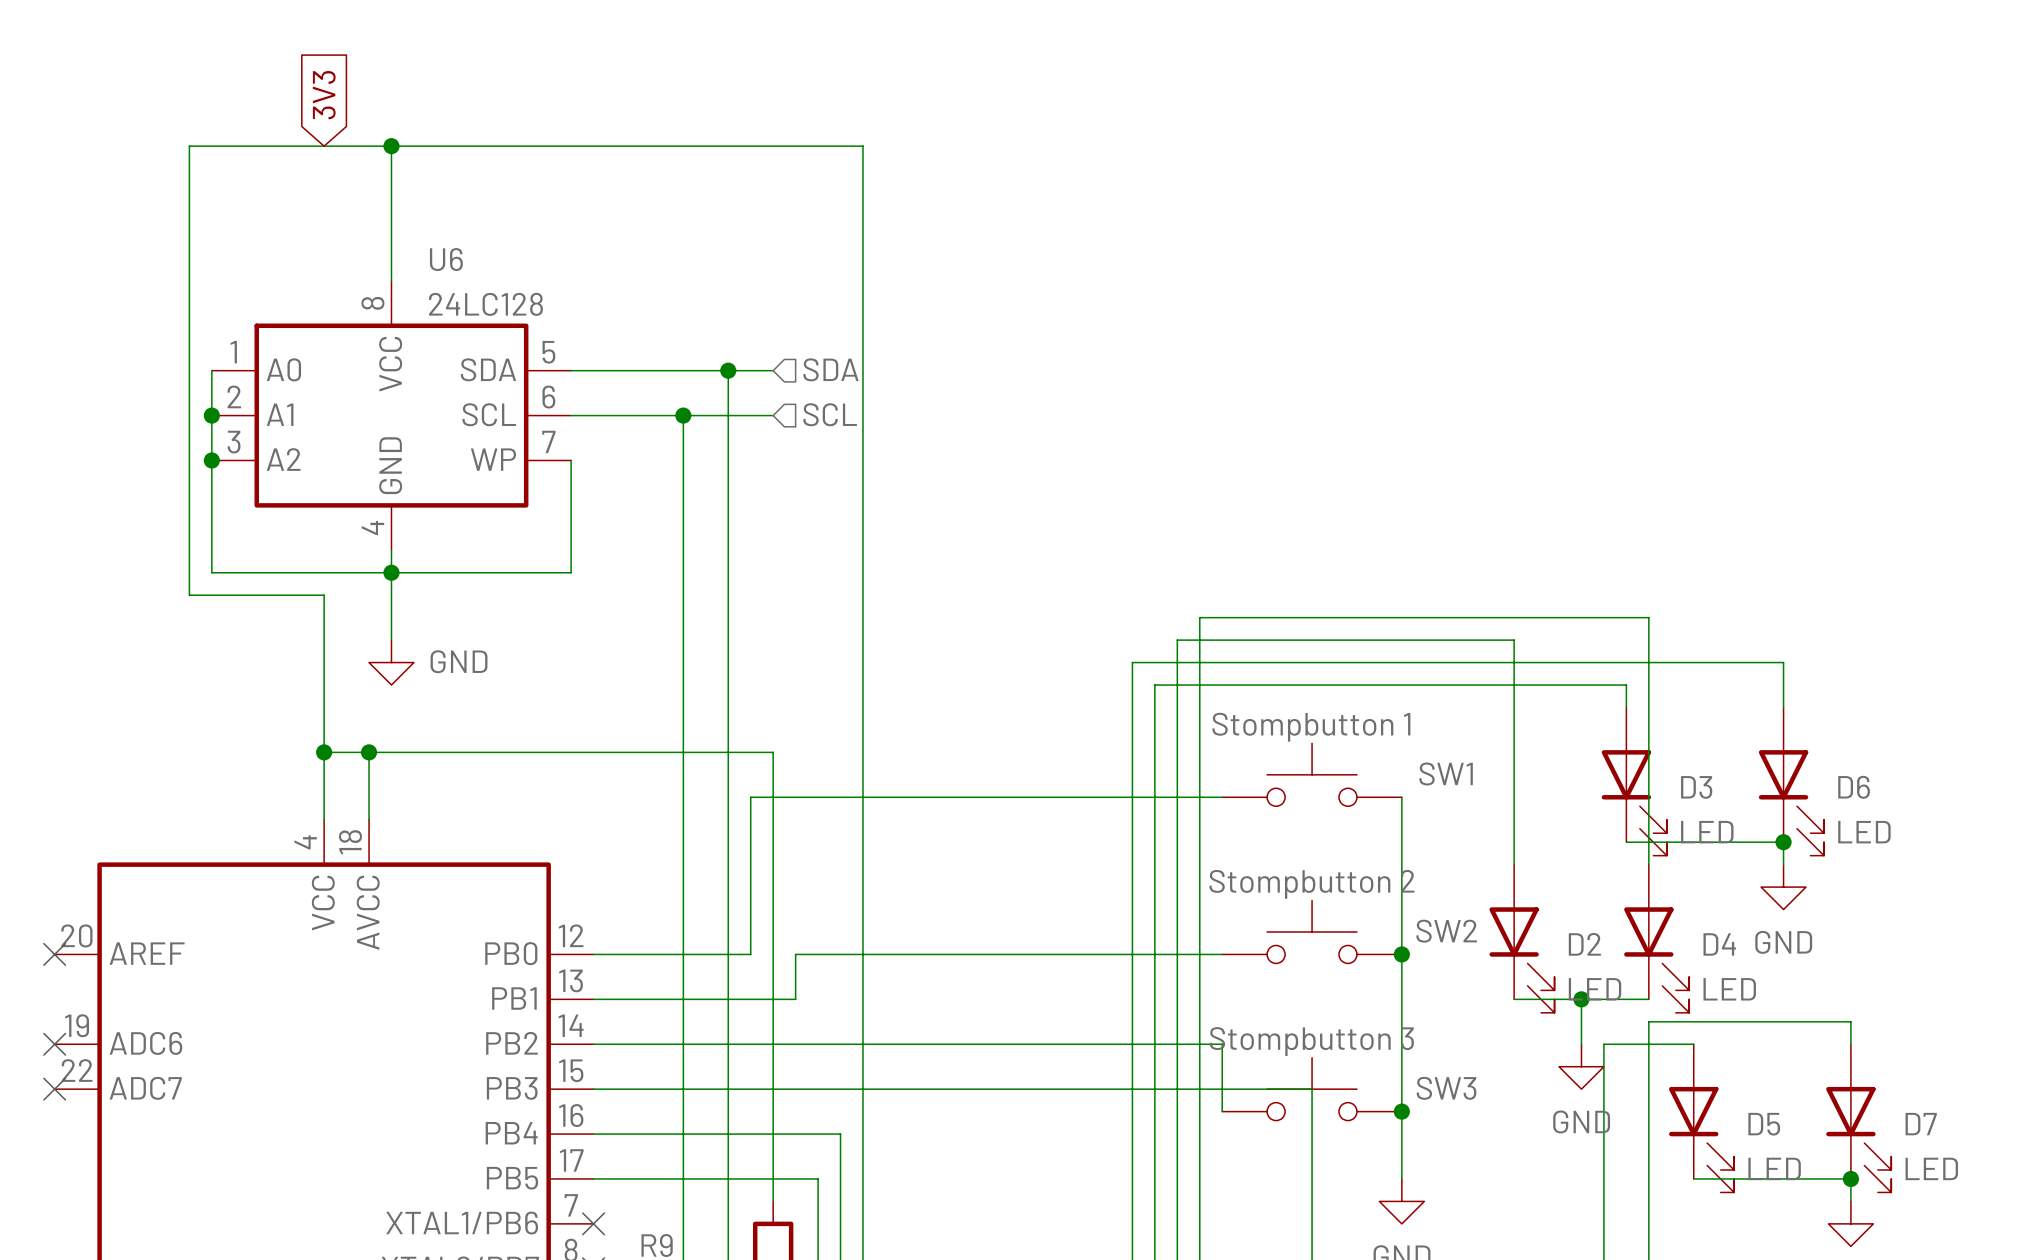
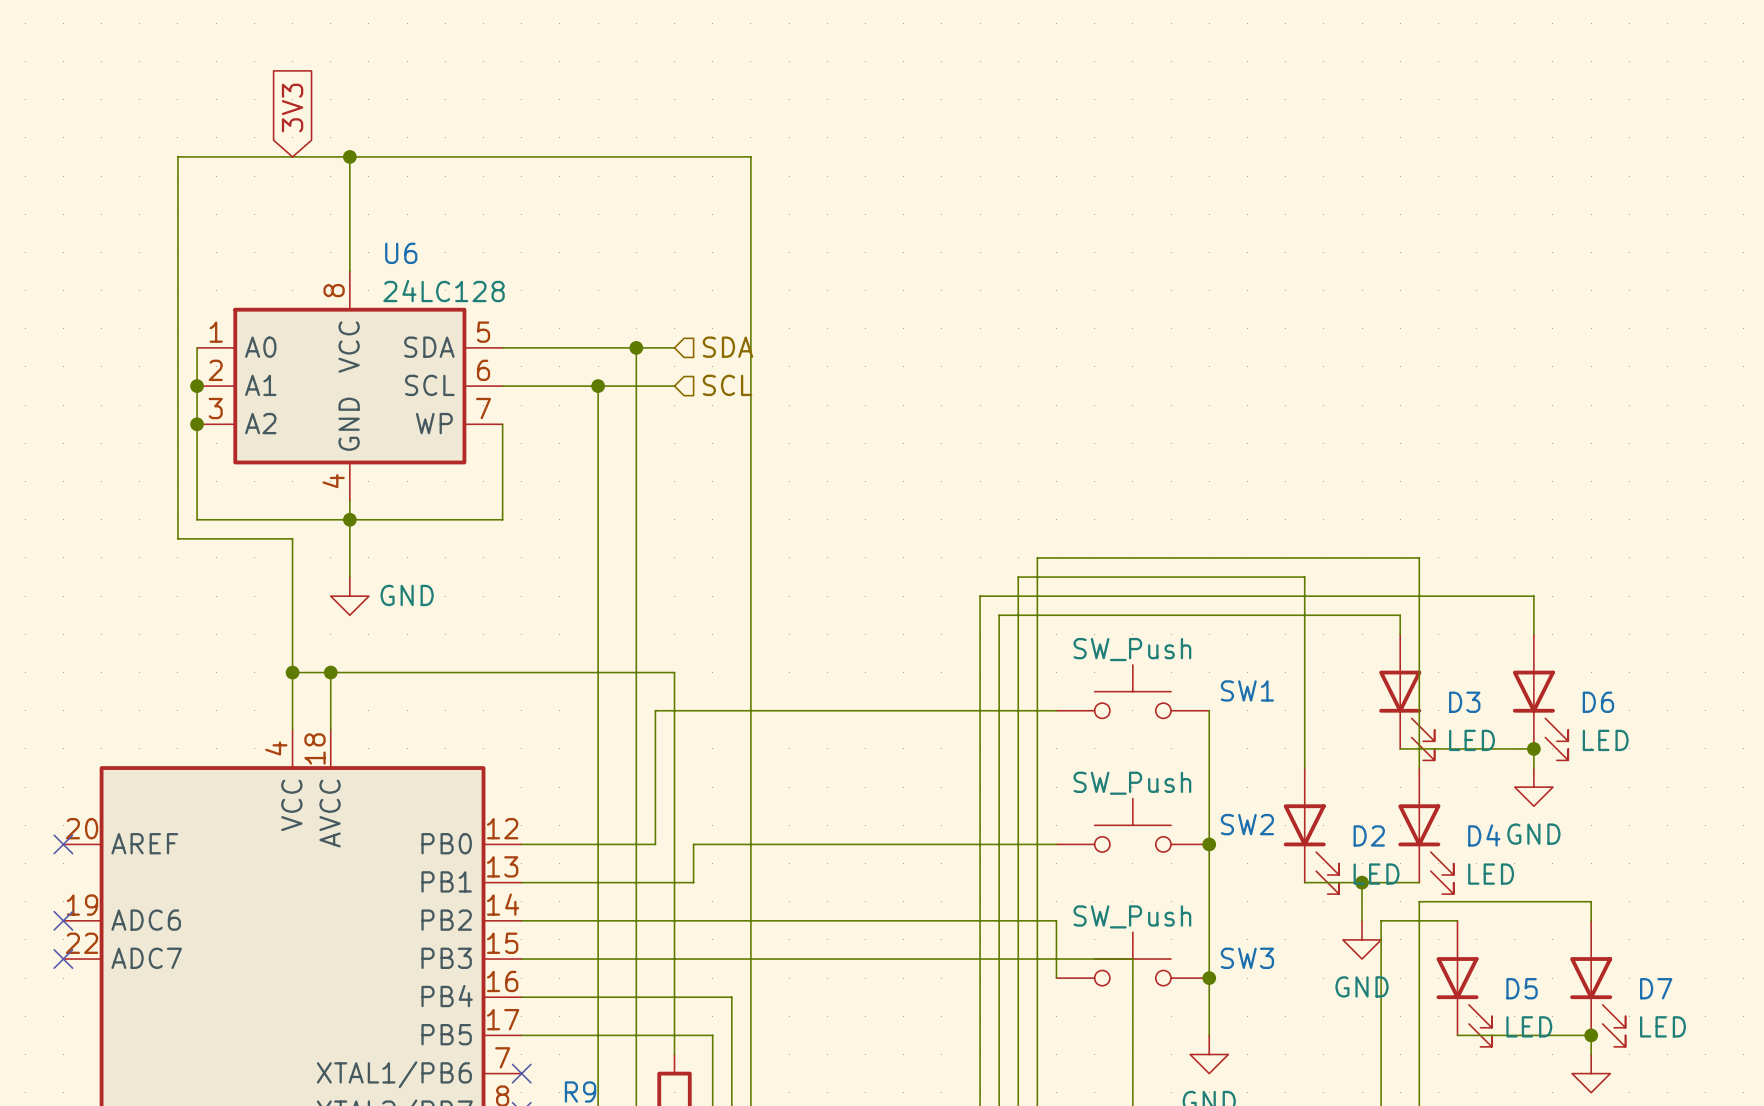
SW1 value: Stompbutton 1 (1311, 727) -> SW_Push (1132, 649)
SW2 value: Stompbutton 2 (1311, 884) -> SW_Push (1132, 783)
SW3 value: Stompbutton 3 (1311, 1041) -> SW_Push (1132, 916)

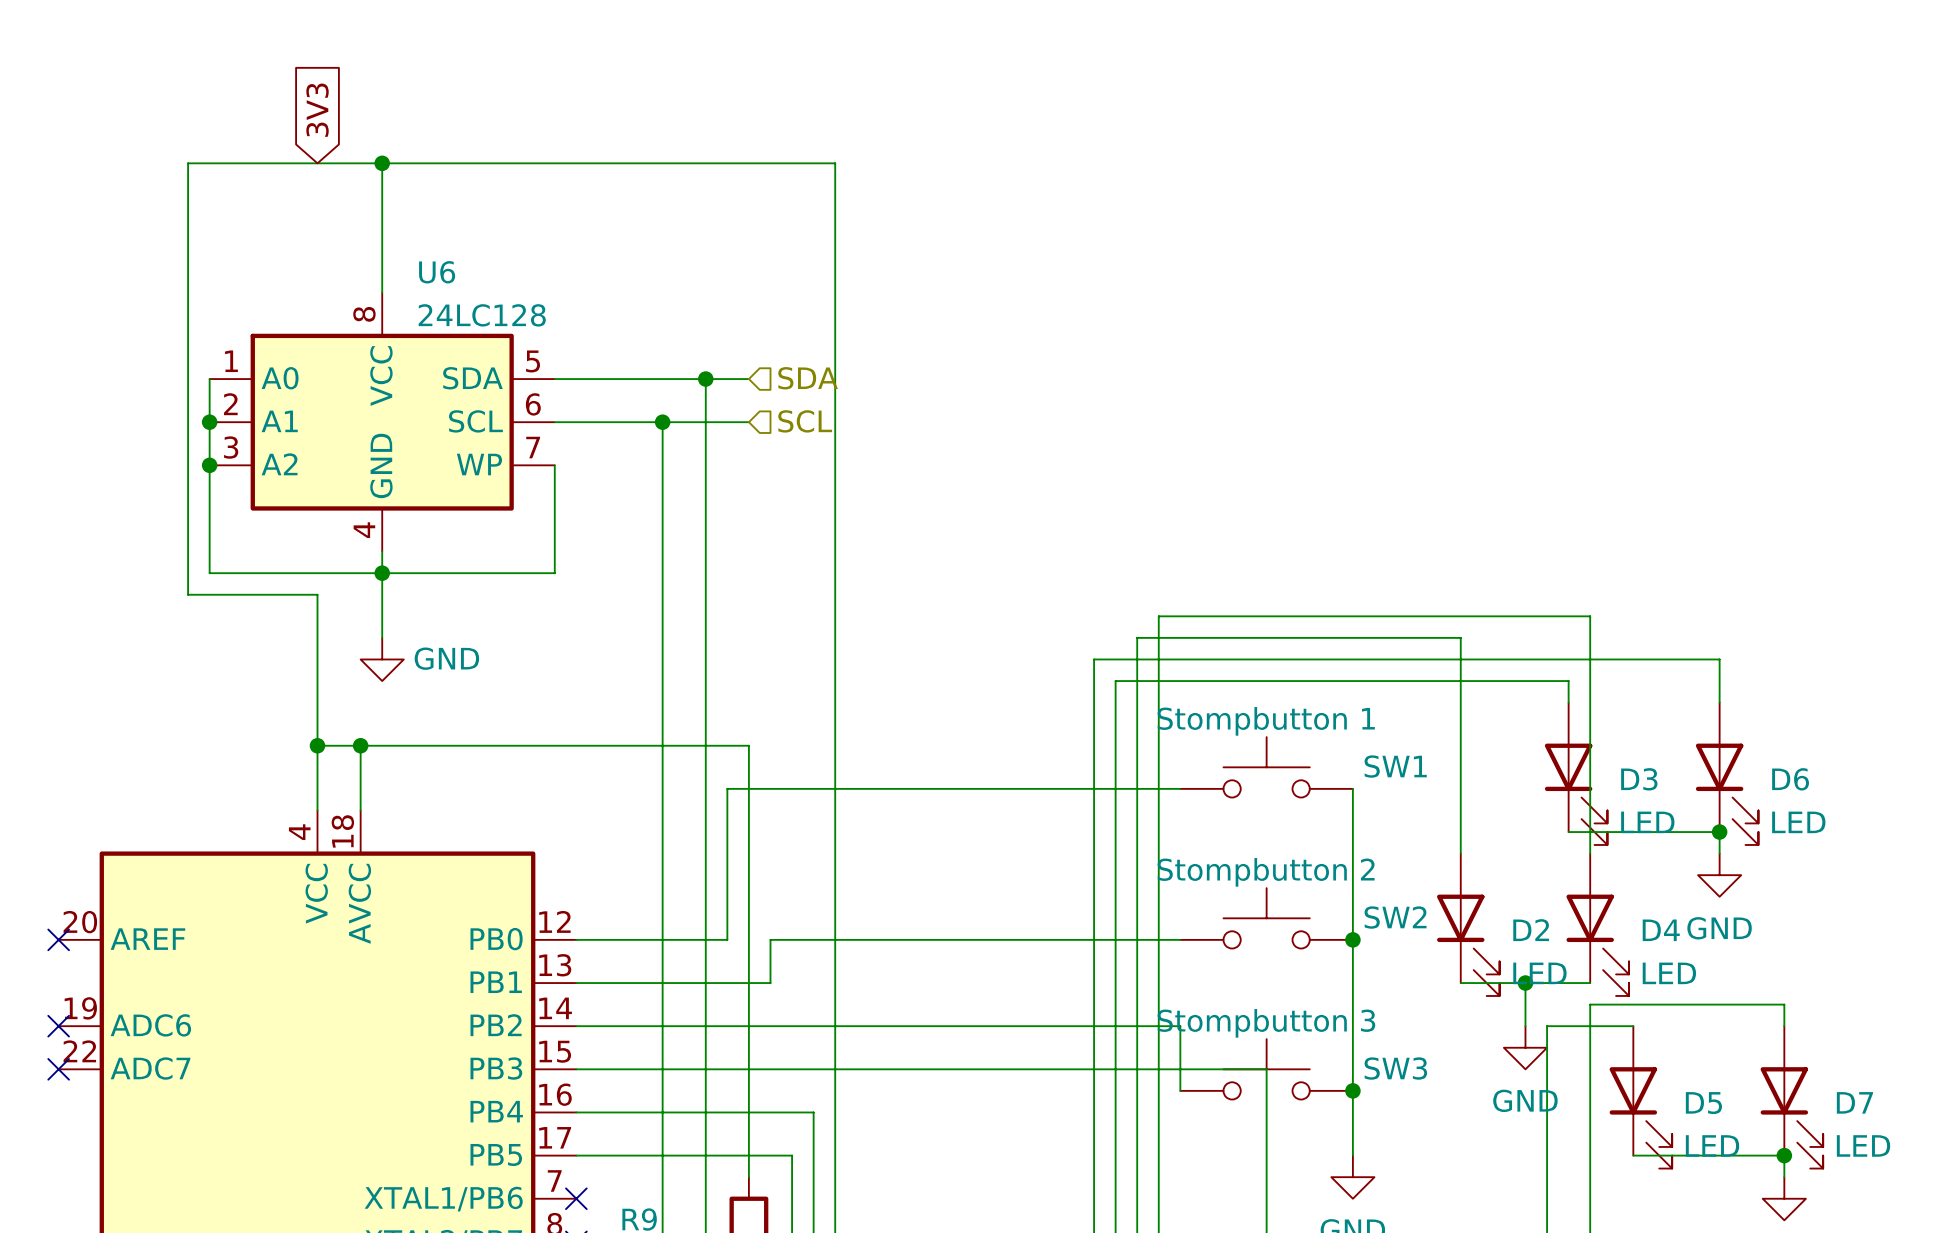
SW1 value: SW_Push (1132, 649) -> Stompbutton 1 (1266, 721)
SW2 value: SW_Push (1132, 783) -> Stompbutton 2 (1266, 872)
SW3 value: SW_Push (1132, 916) -> Stompbutton 3 (1266, 1023)

